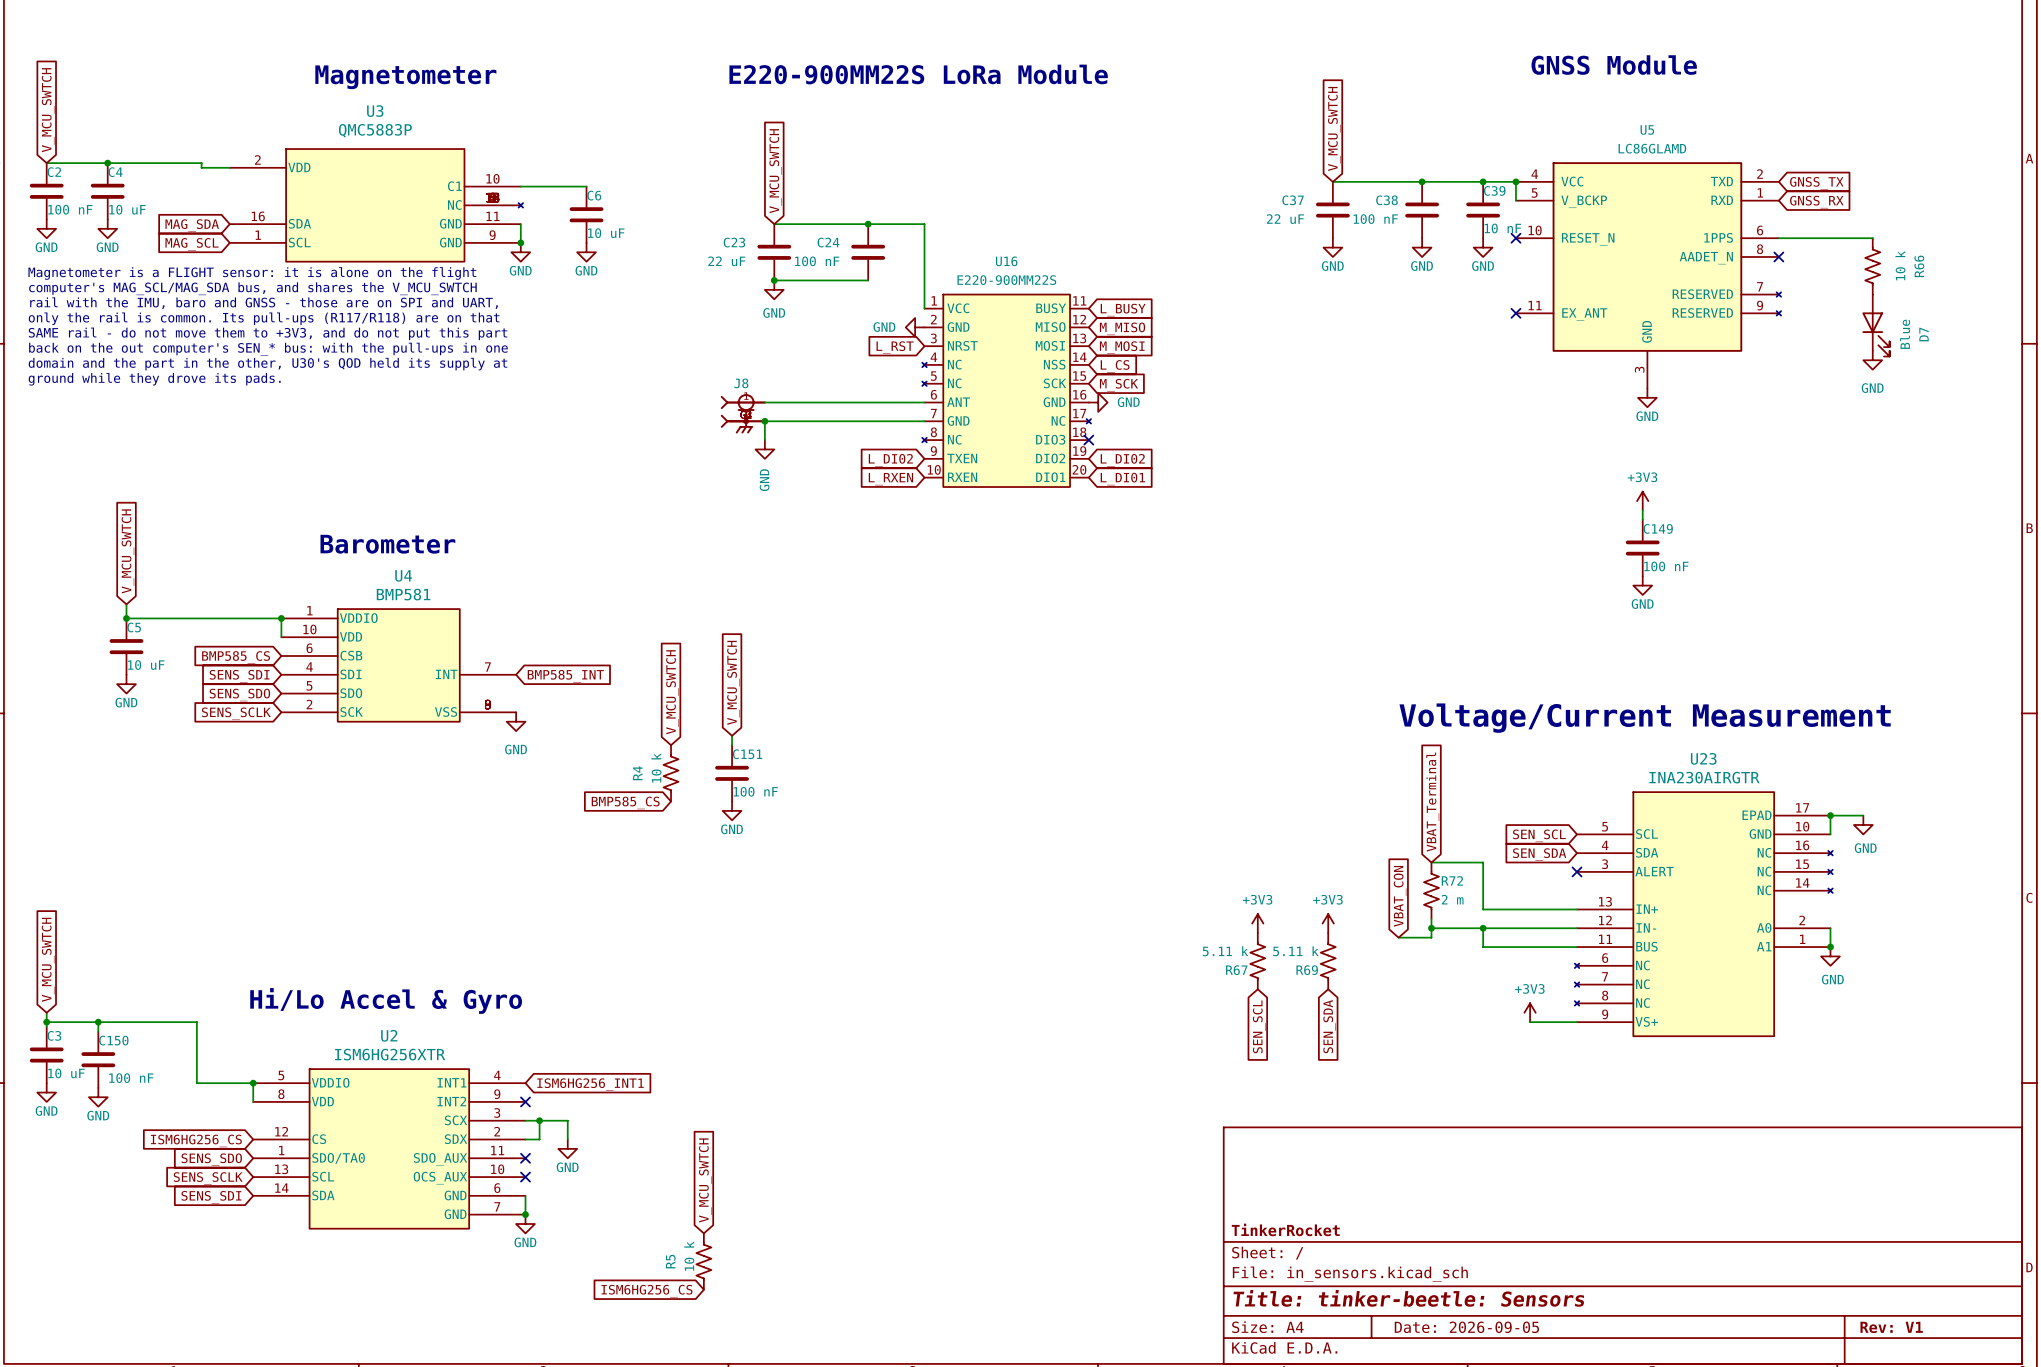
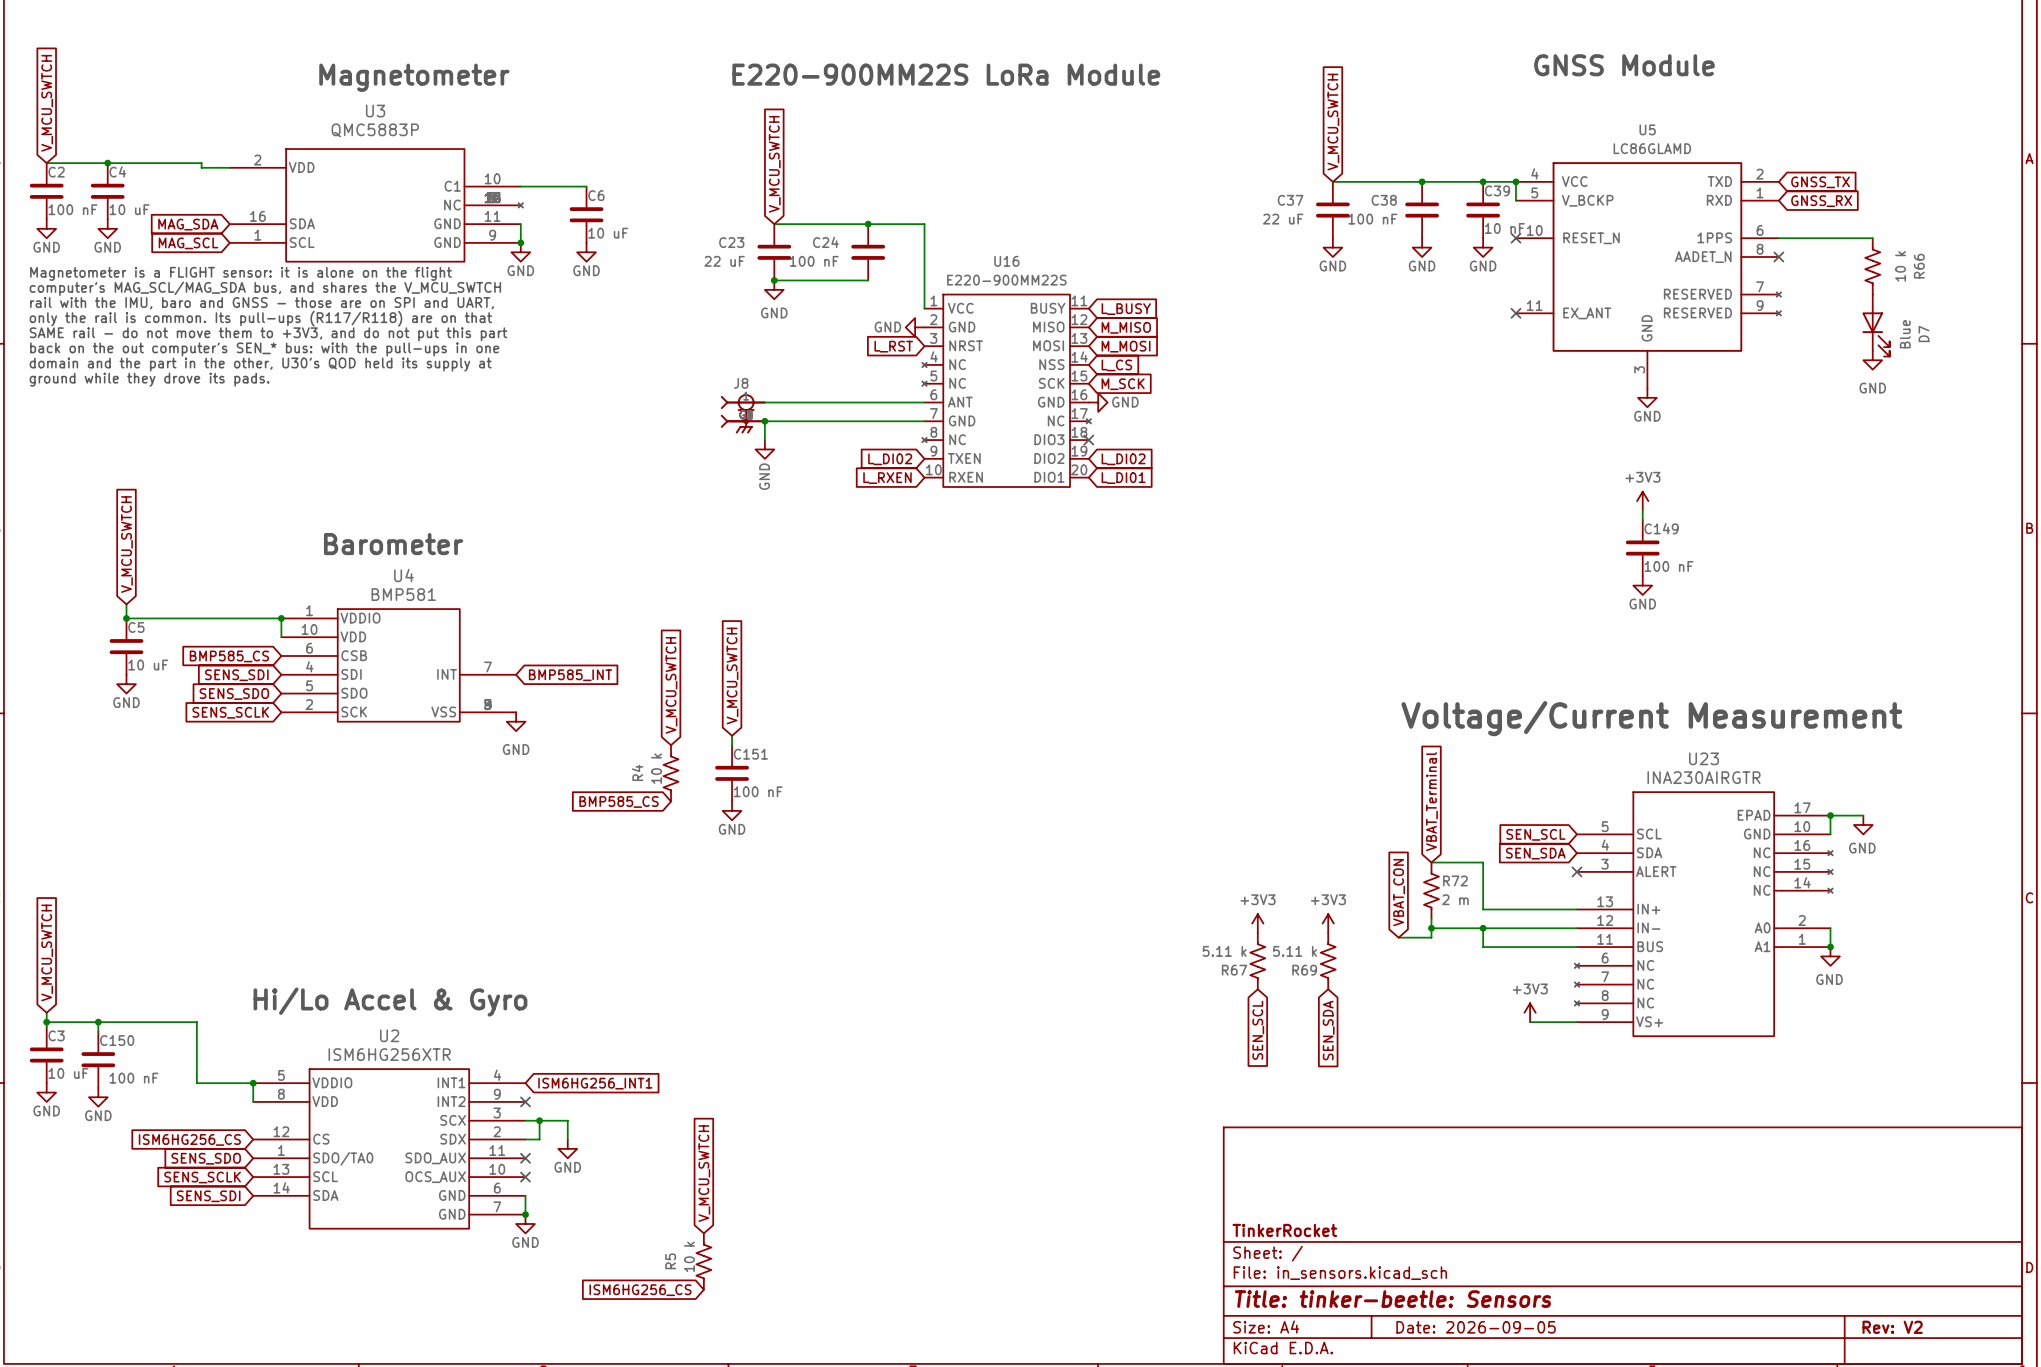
title block: Rev: V1 (1891, 1327) -> Rev: V2 (1892, 1327)

